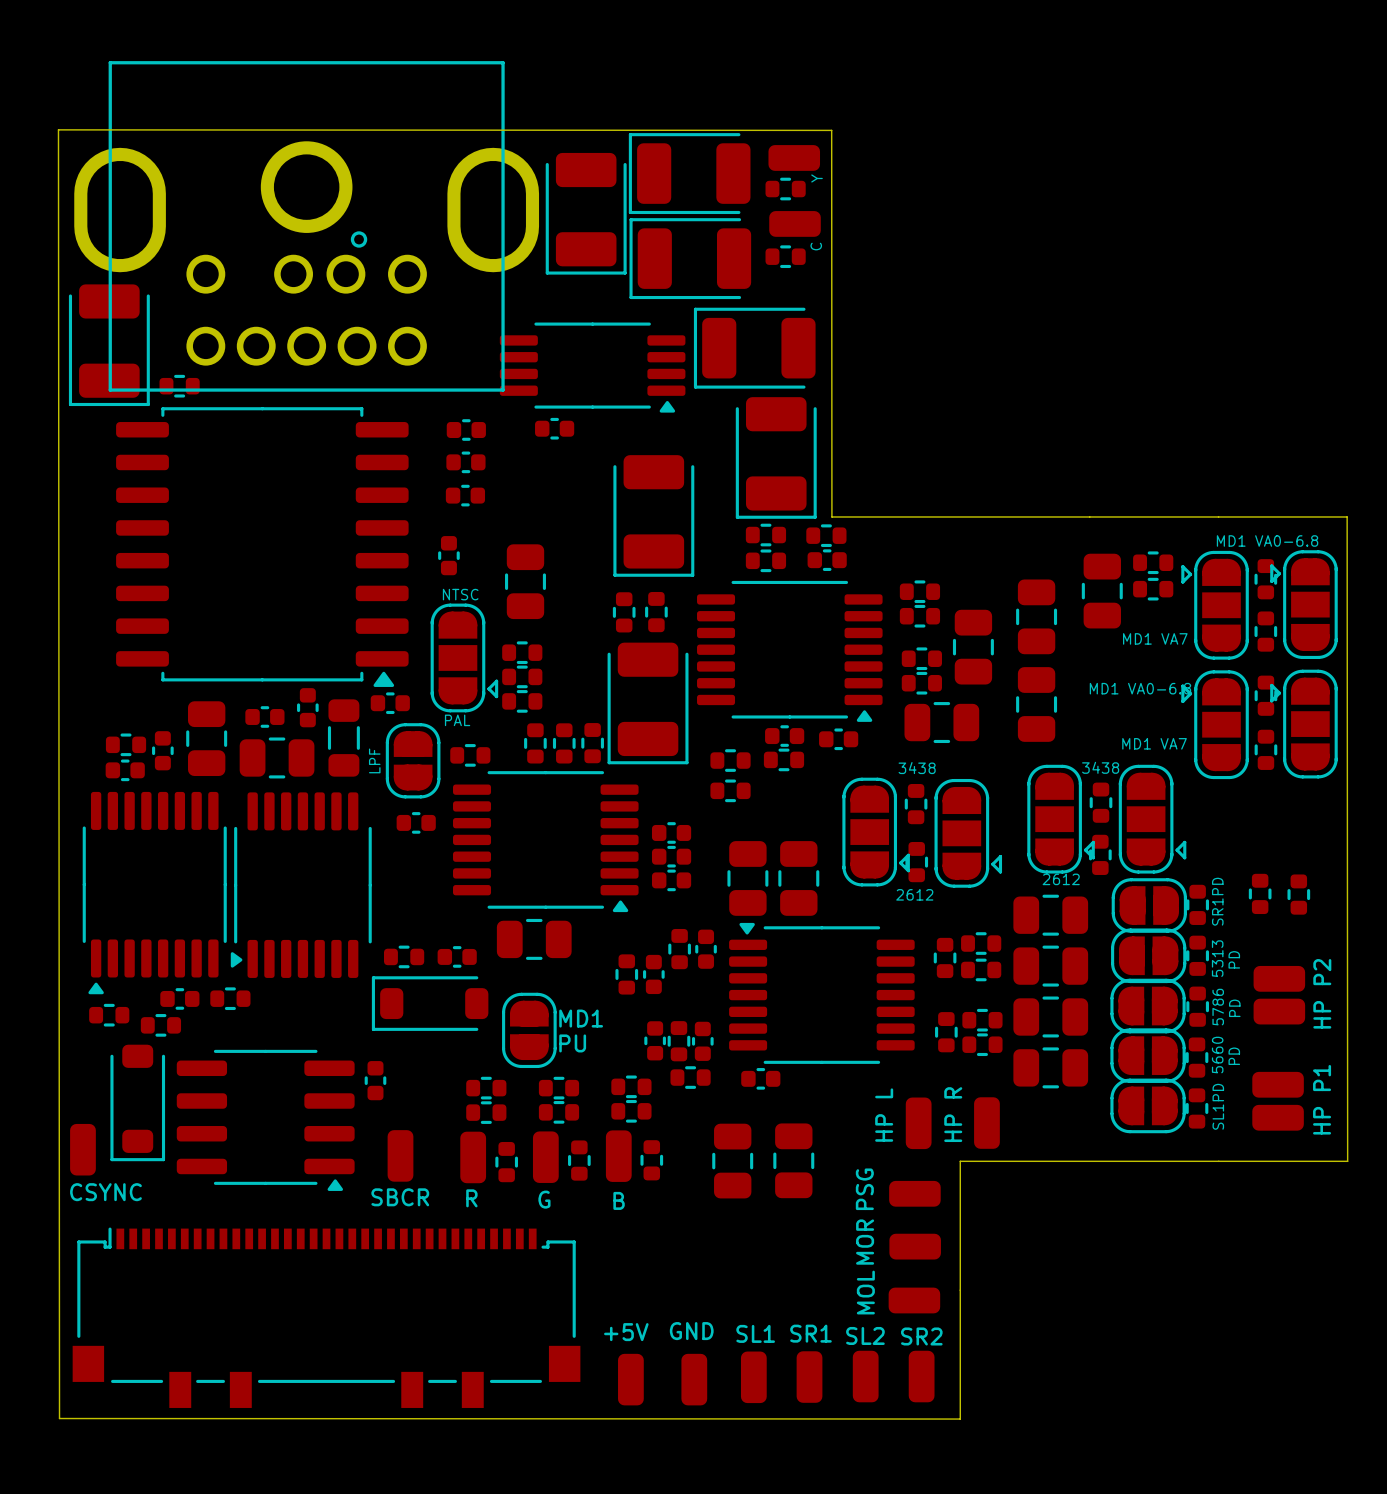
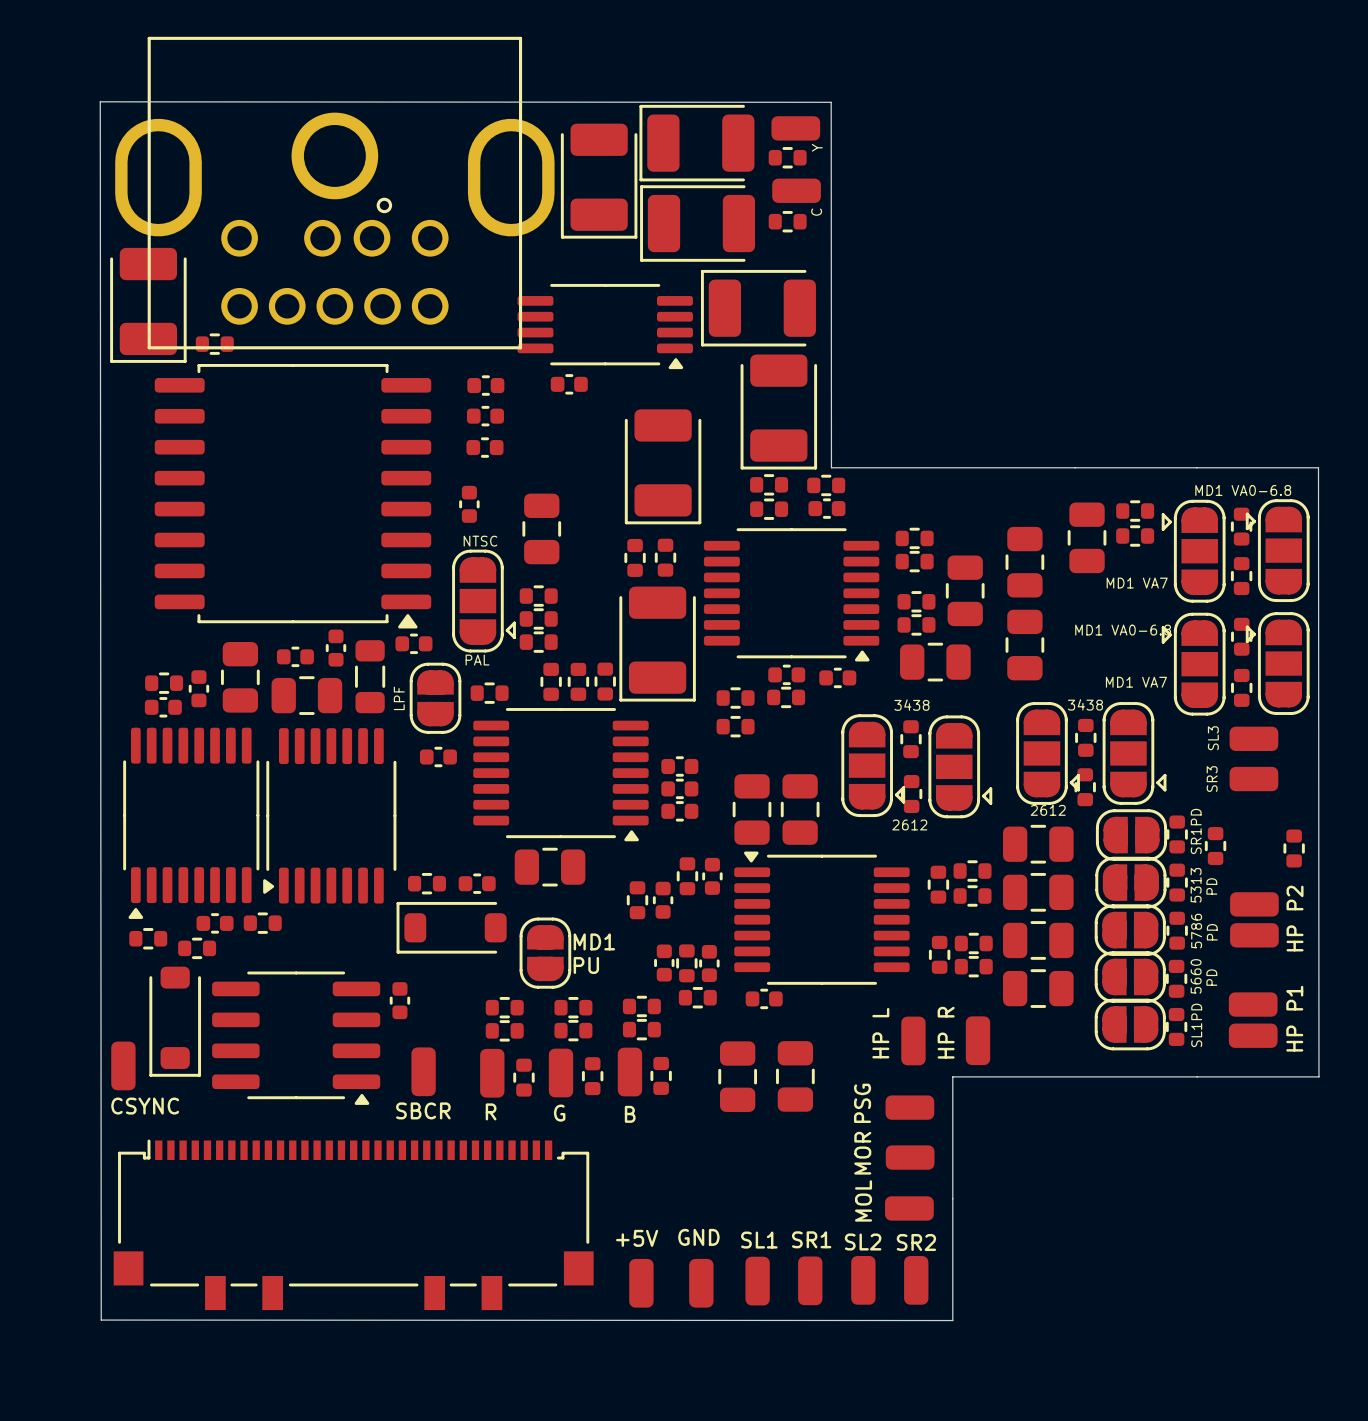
SL3: none -> (1253, 738)
SR3: none -> (1253, 779)
part position: (1260, 893) -> (1215, 846)
part: (1298, 894) -> none
part: none -> (1294, 848)

